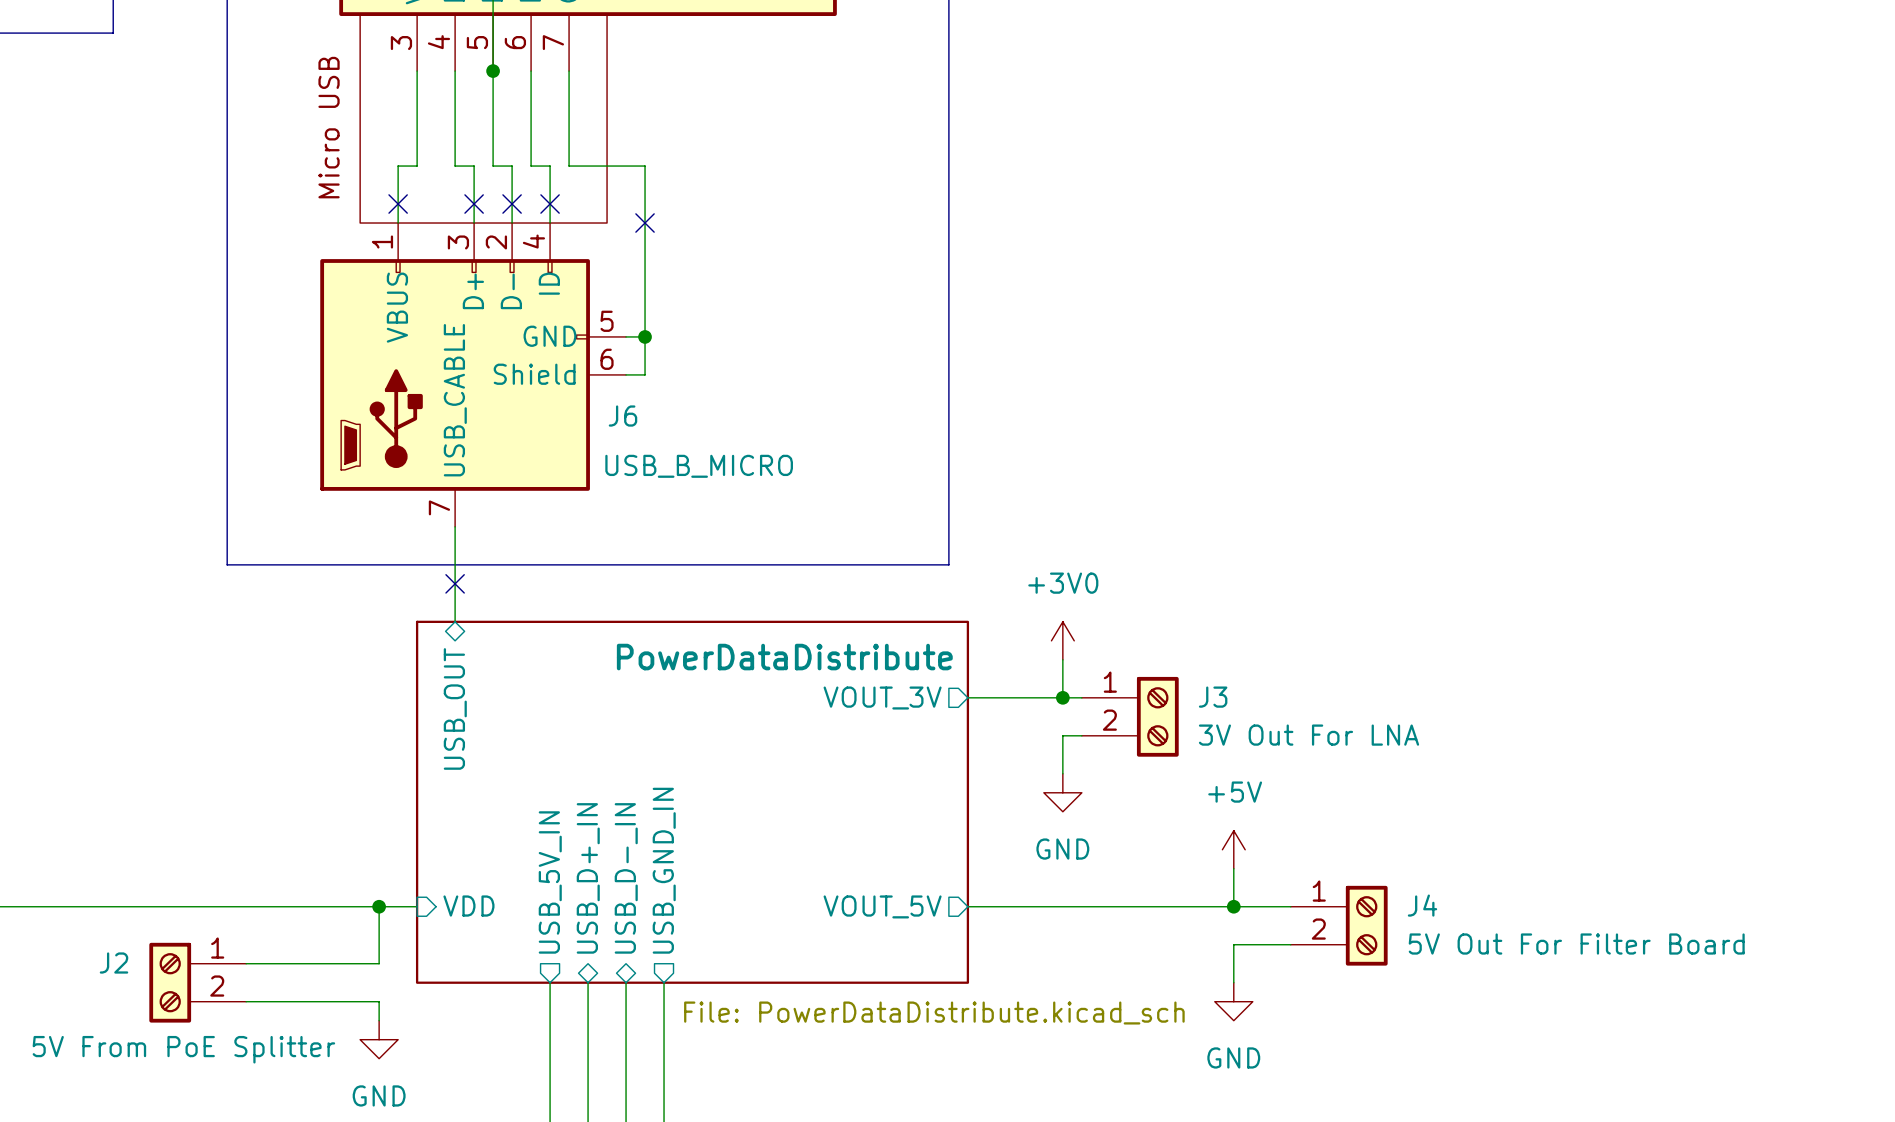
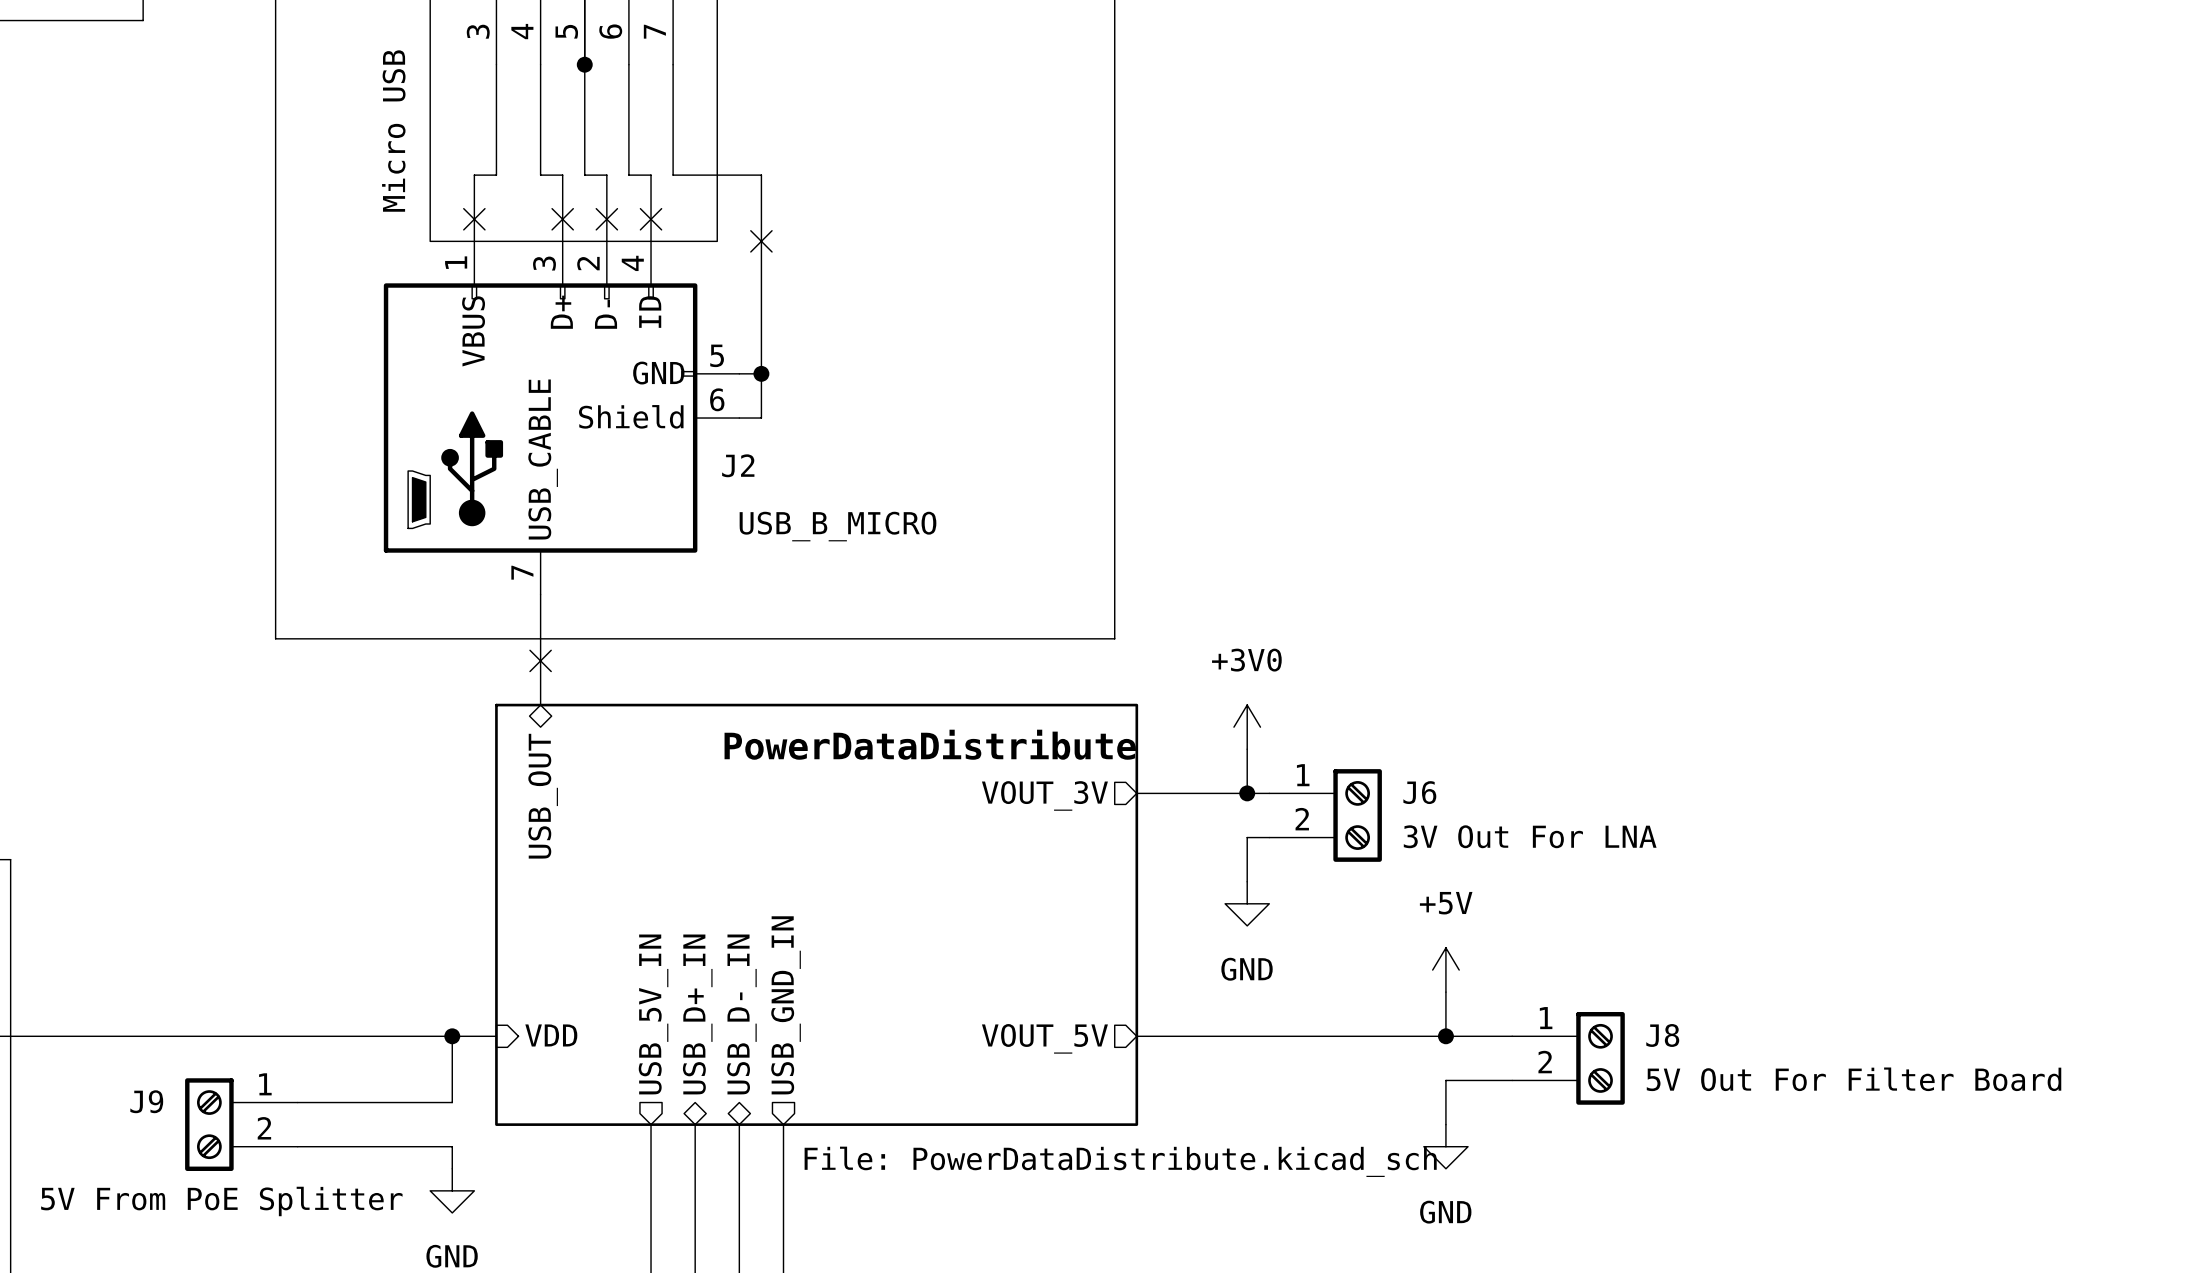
J6 name: J6 (622, 416) -> J2 (738, 465)
J3 name: J3 (1213, 697) -> J6 (1419, 792)
J4 name: J4 (1422, 905) -> J8 (1662, 1035)
J2 name: J2 (113, 963) -> J9 (146, 1101)

